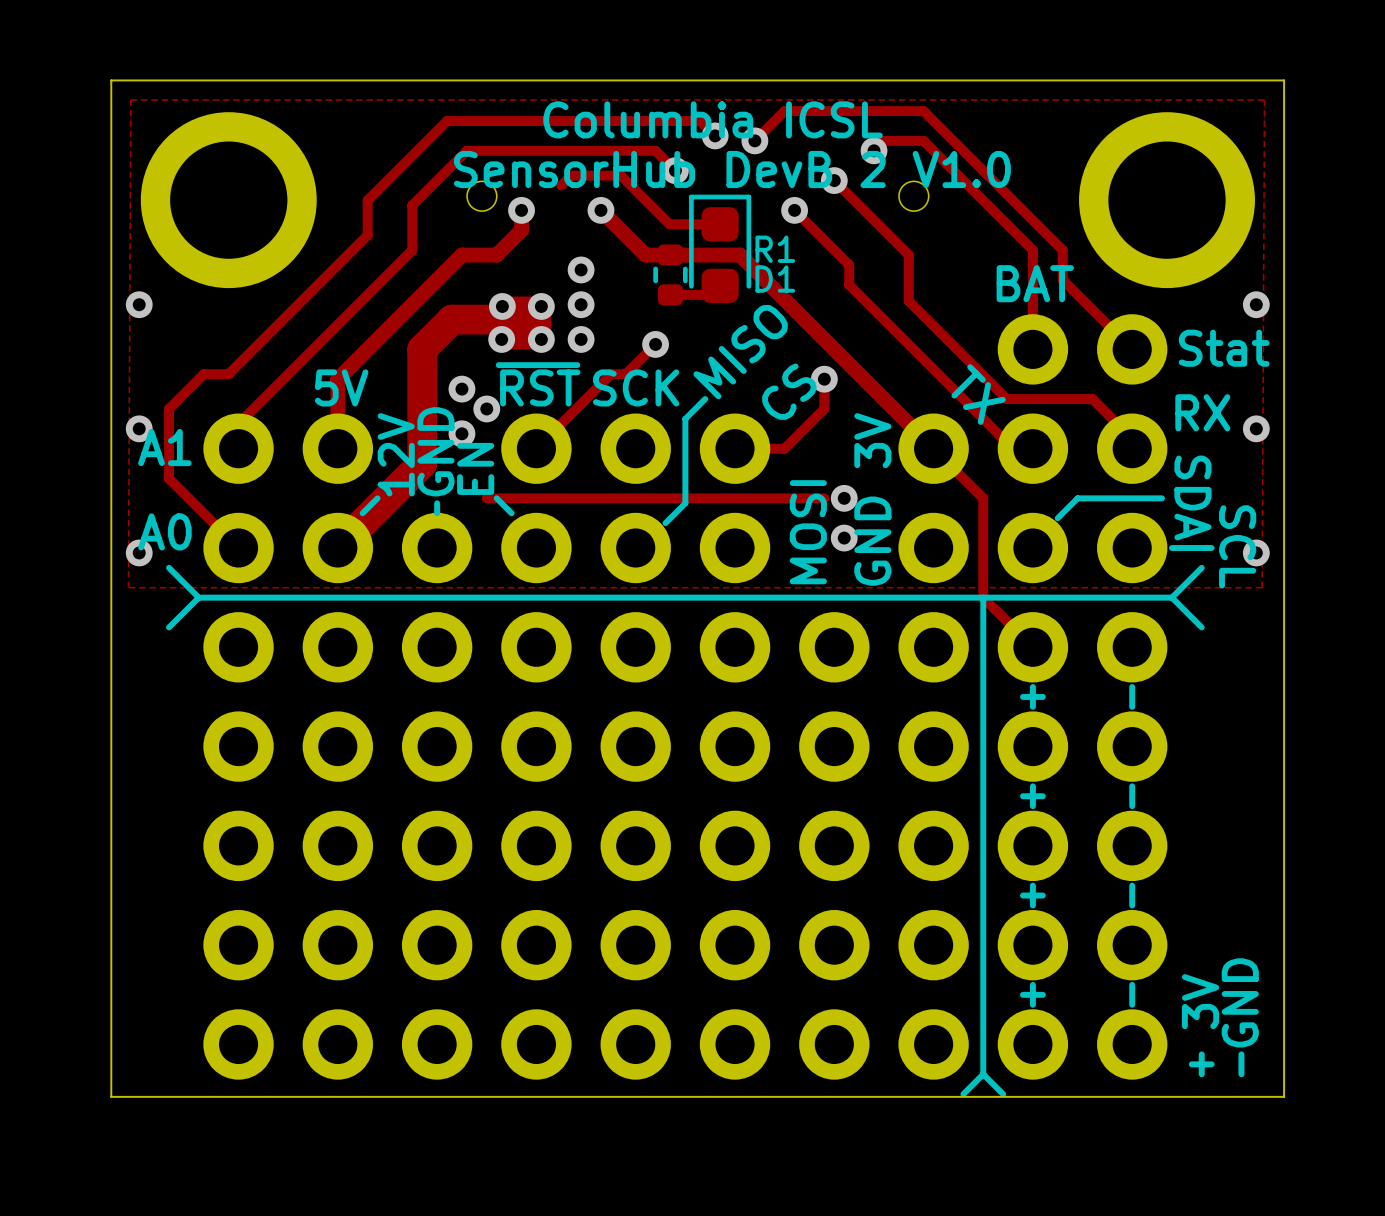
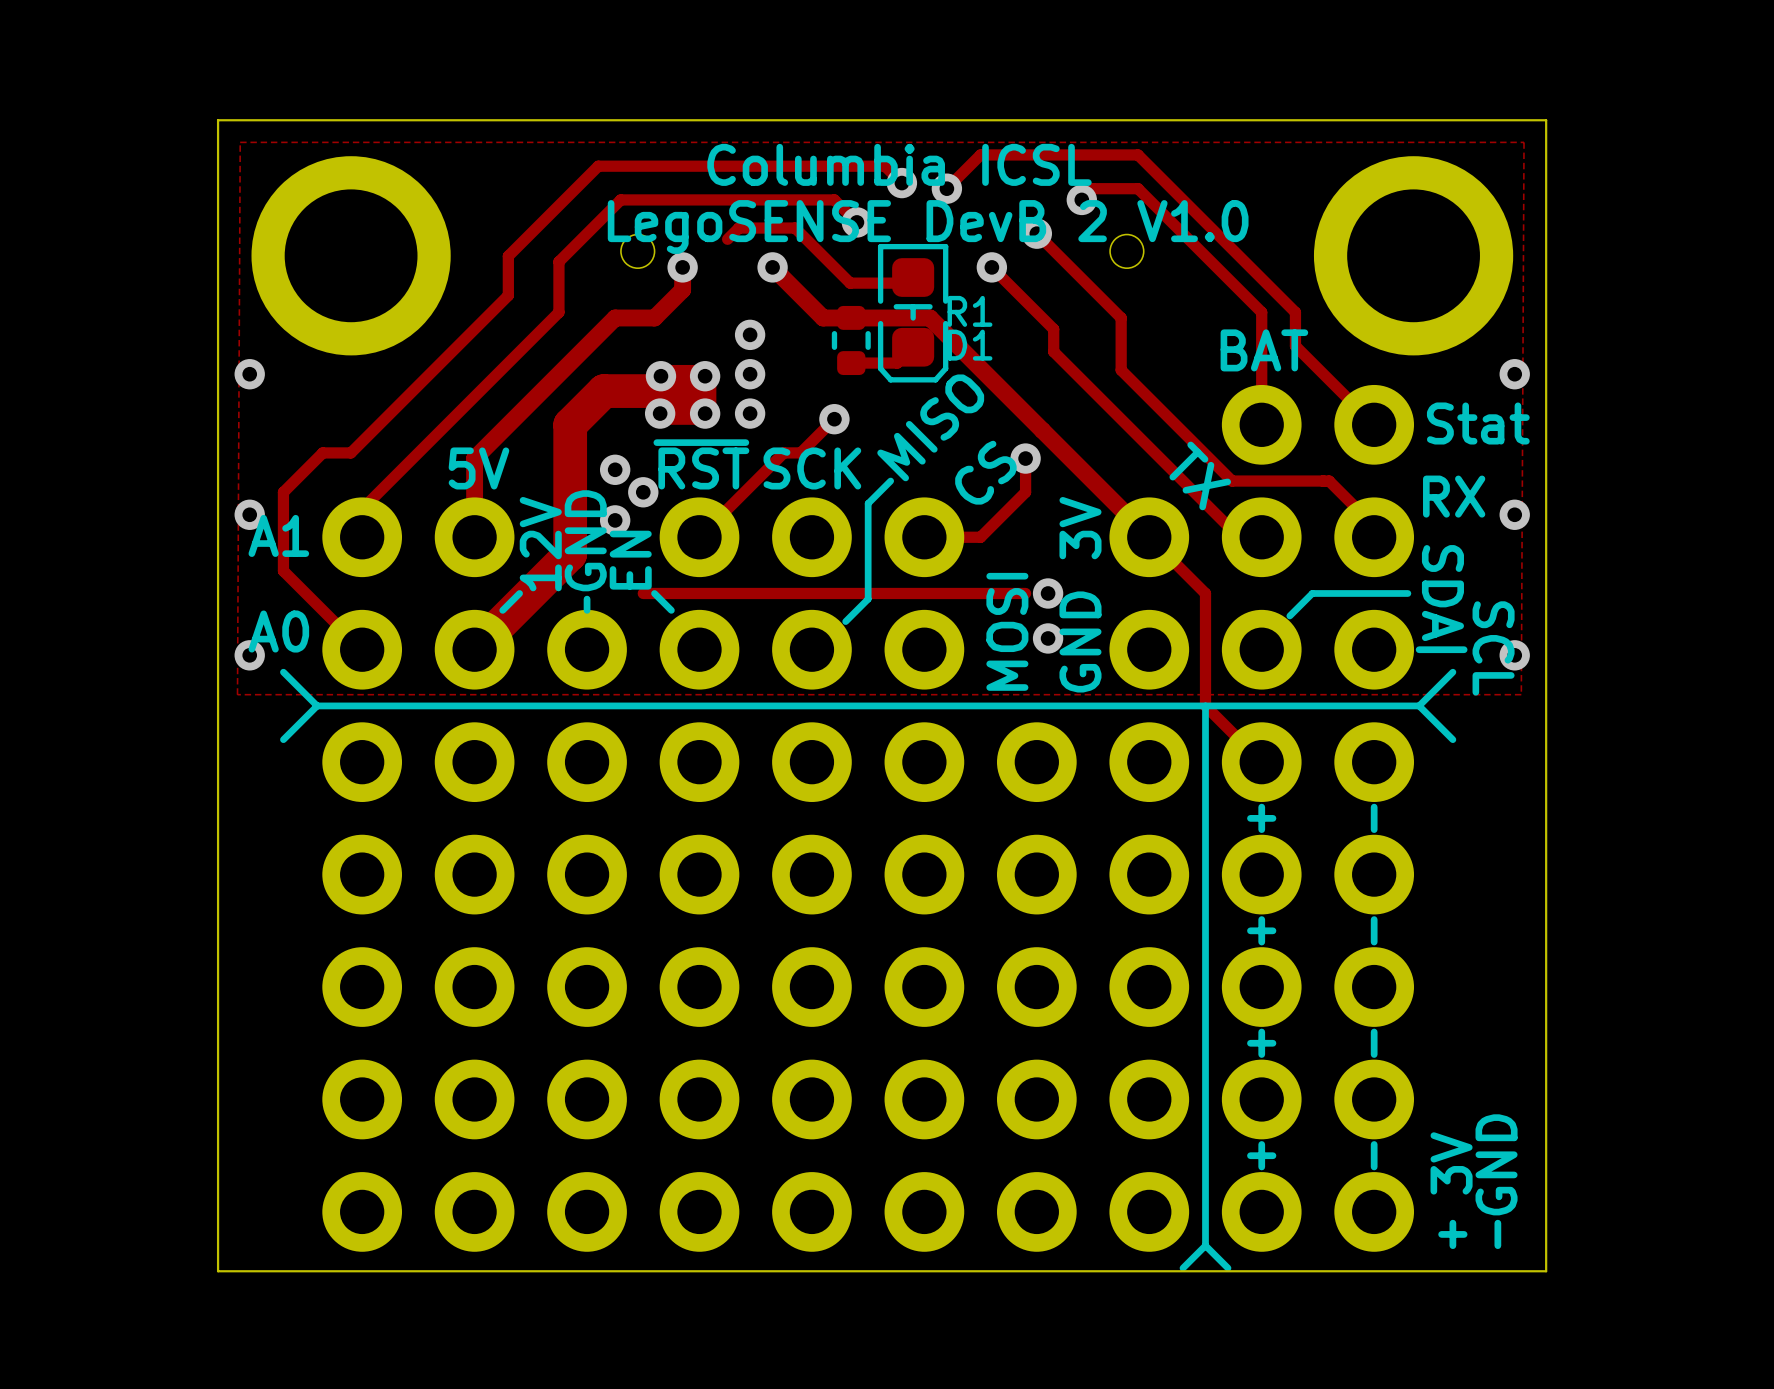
text: SensorHub DevB 2 V1.0 (732, 169) -> LegoSENSE DevB 2 V1.0 (928, 227)
D1 footprint: [689, 194, 752, 303] -> [877, 243, 949, 383]

